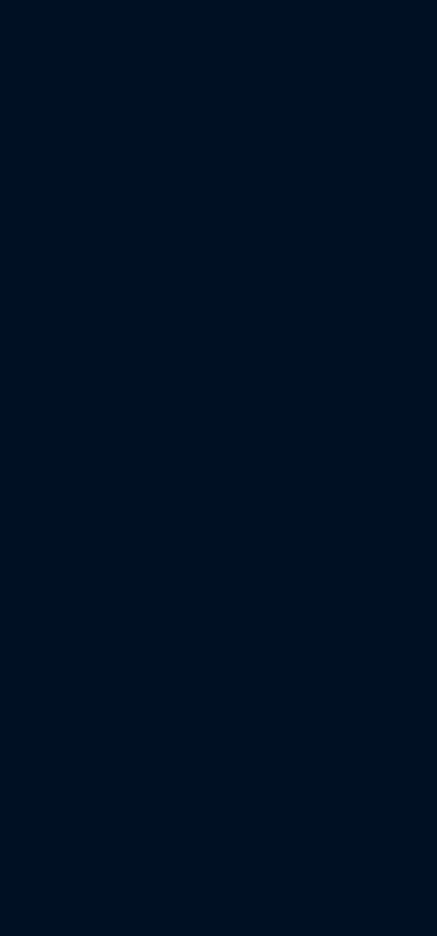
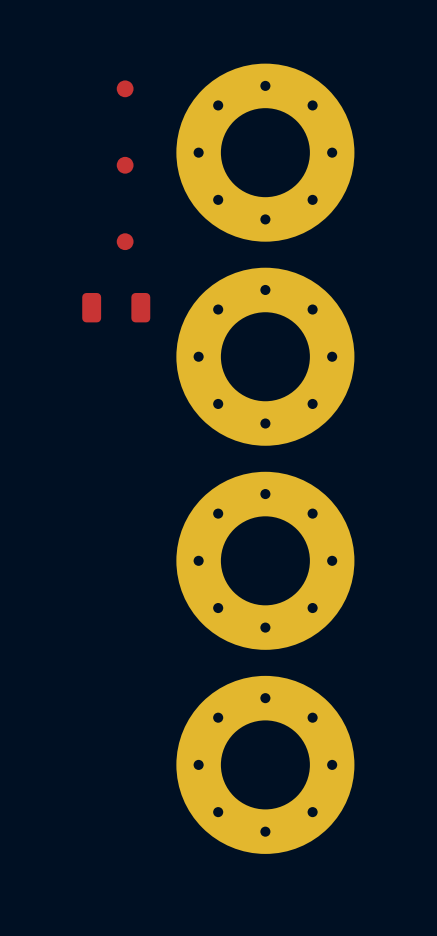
part: none -> (125, 88)
part: none -> (265, 152)
part: none -> (125, 165)
part: none -> (125, 241)
part: none -> (116, 307)
part: none -> (265, 356)
part: none -> (265, 560)
part: none -> (265, 764)

